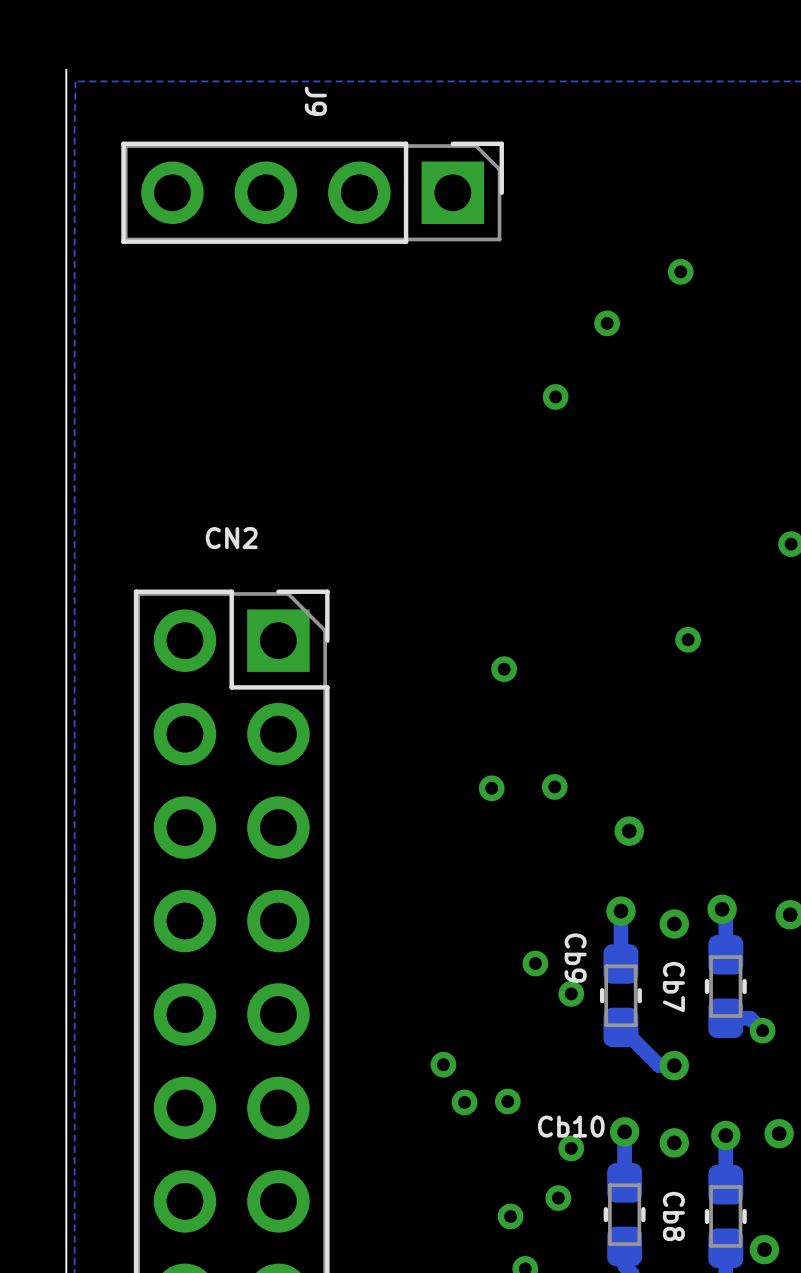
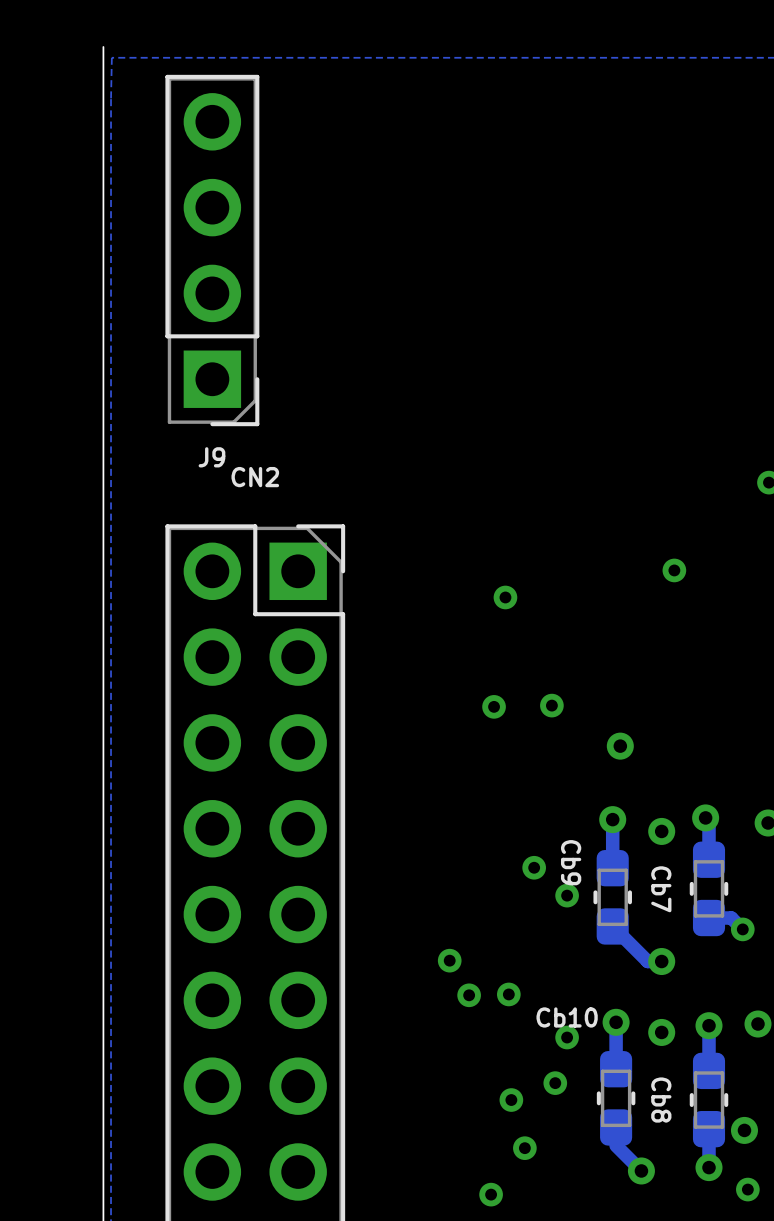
J9 name position: J9 (315, 101) -> J9 (211, 457)
J9 rotation: 0° (312, 192) -> 90° clockwise (212, 250)
via: (680, 271) -> none
via: (607, 323) -> none
via: (555, 396) -> none

